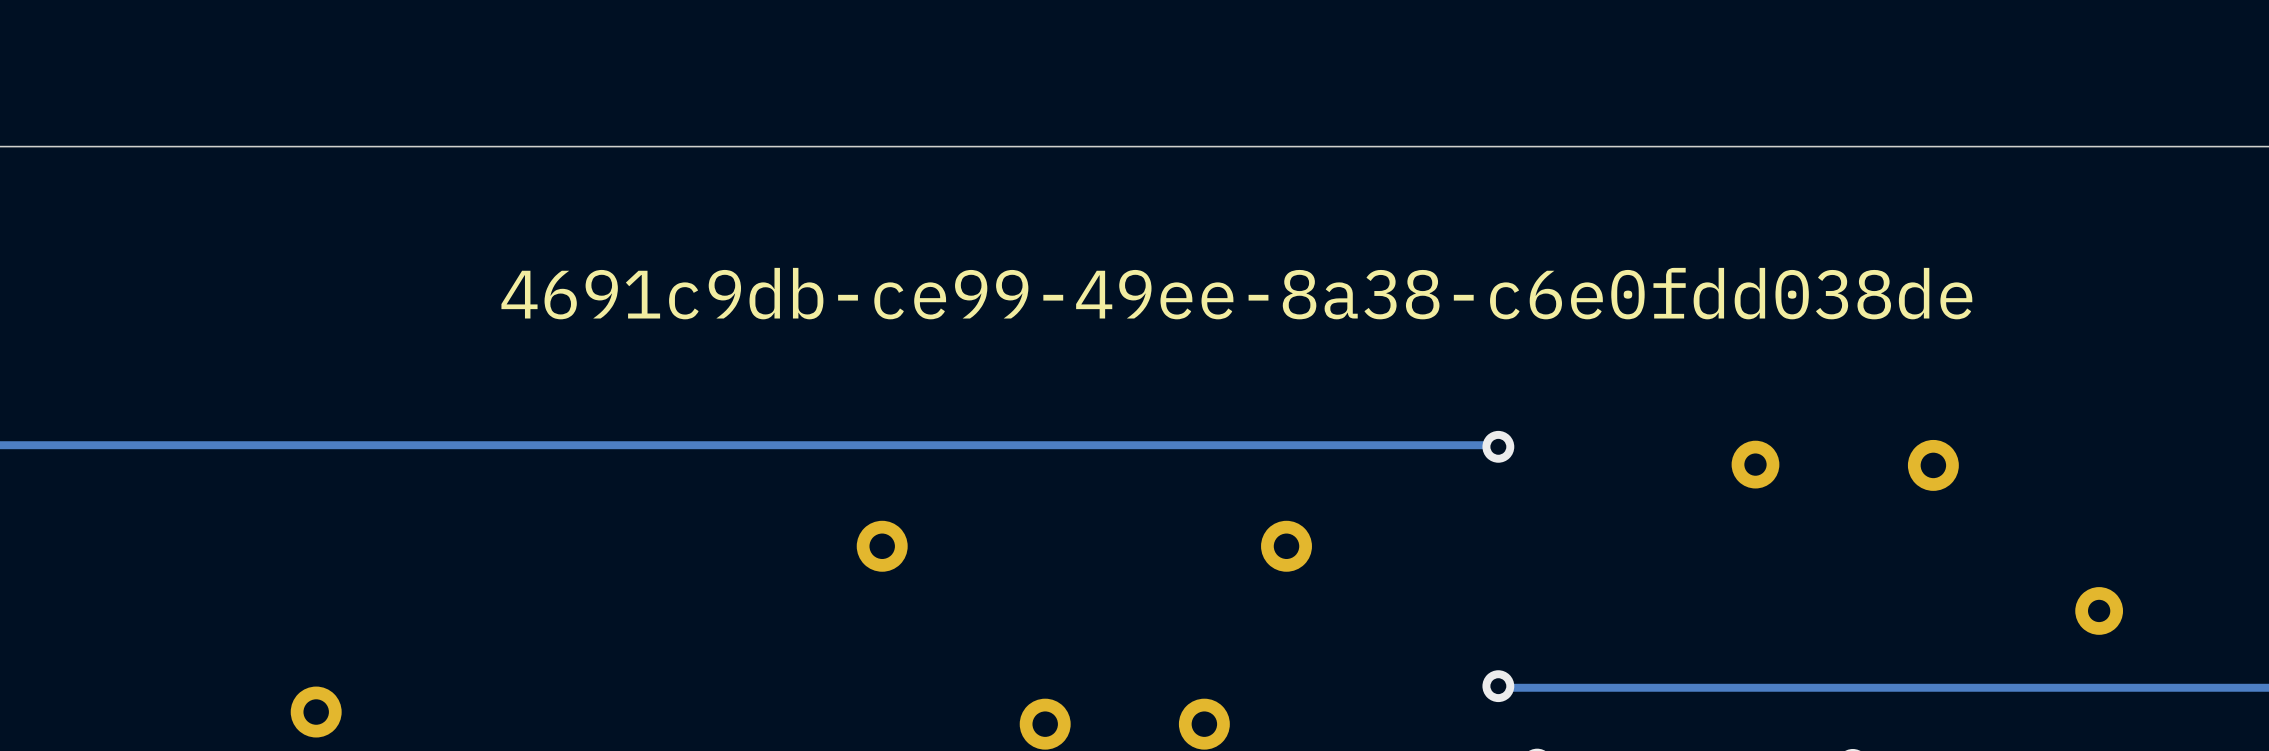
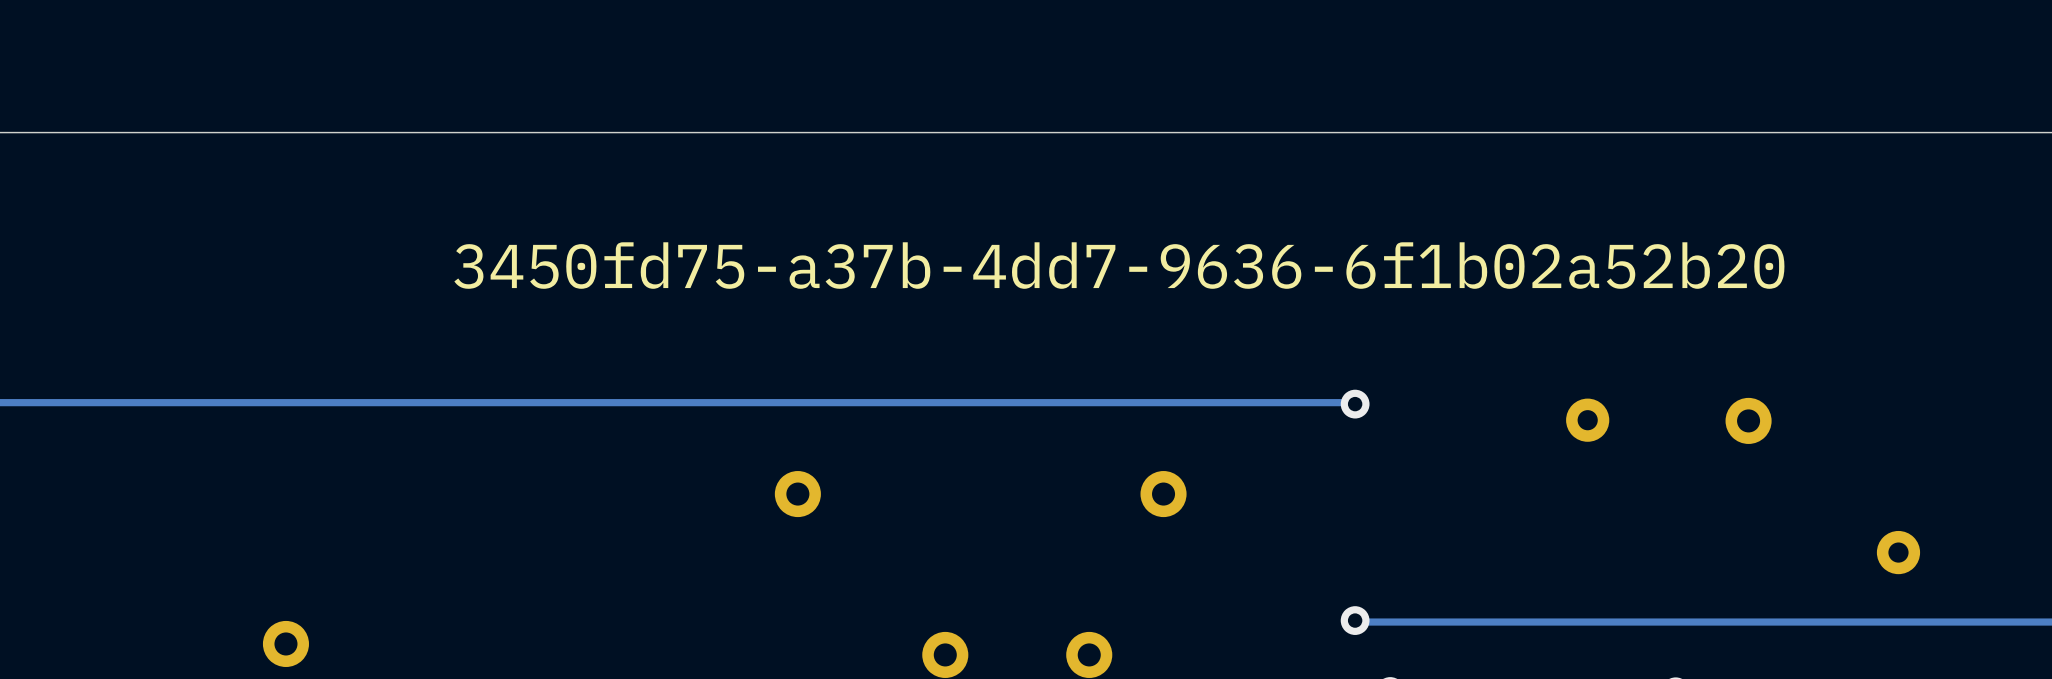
text: 4691c9db-ce99-49ee-8a38-c6e0fdd038de (1236, 293) -> 3450fd75-a37b-4dd7-9636-6f1b02a52b20 (1119, 265)

